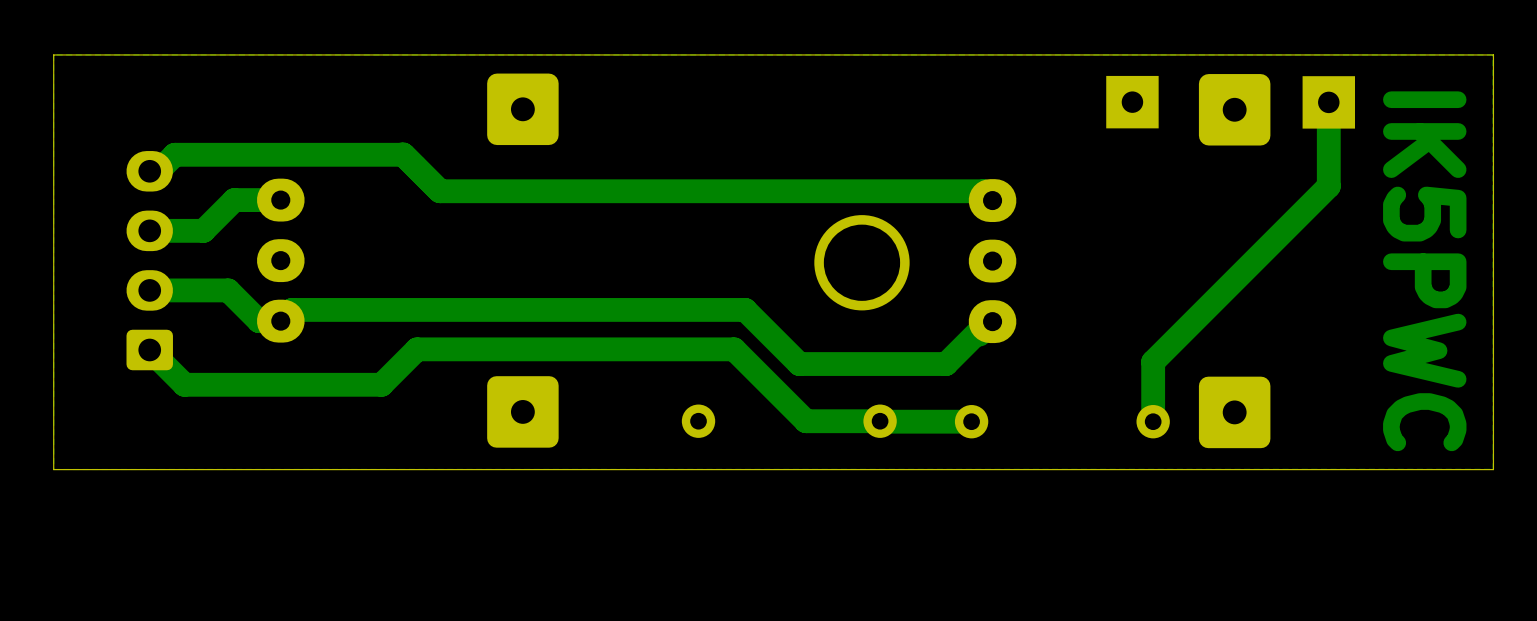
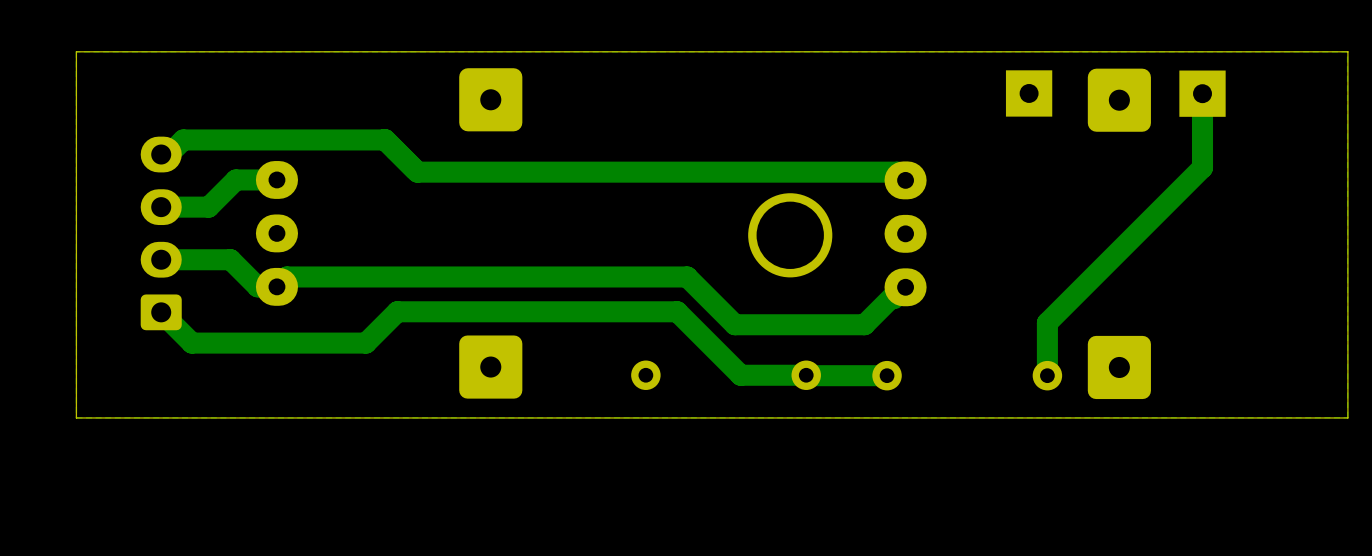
text: IK5PWC (1424, 271) -> none

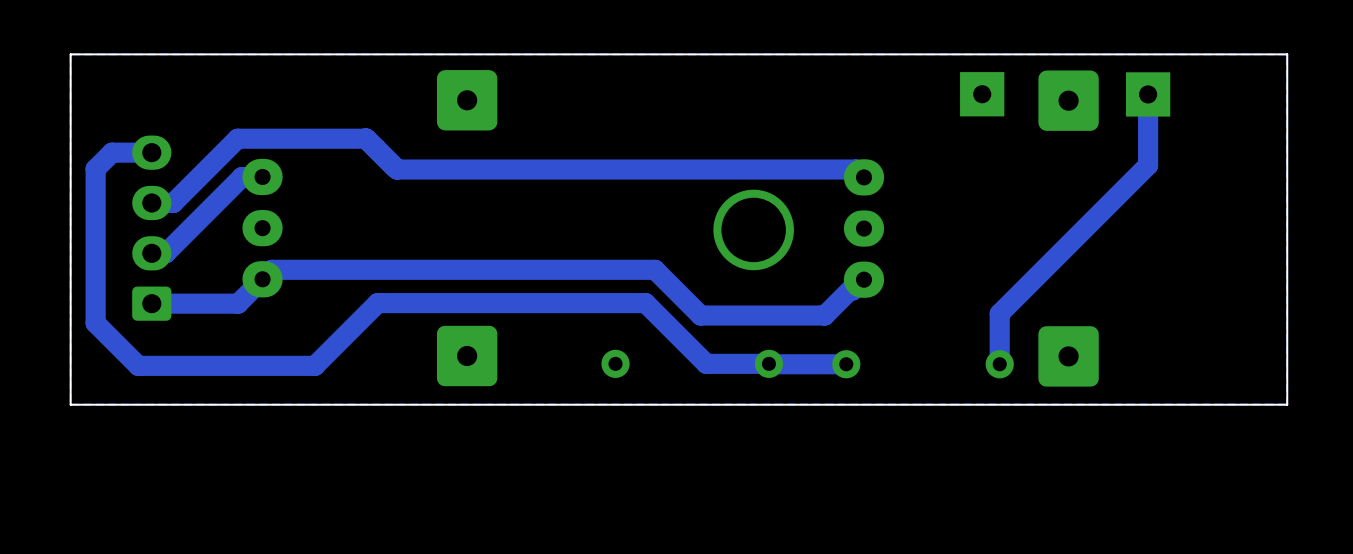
bottom track: (250, 139) (183, 139) (168, 154) (161, 154) -> none
bottom track: (255, 179) (235, 179) (208, 207) (183, 207) -> (237, 138) (173, 202)
bottom track: none -> (242, 176) (165, 253)
bottom track: (175, 259) (230, 259) (257, 286) (276, 286) -> (151, 303) (238, 303) (262, 279)
bottom track: (161, 312) (191, 343) (366, 343) -> (151, 152) (112, 152) (95, 169) (95, 323) (138, 365) (314, 365) (347, 333)

